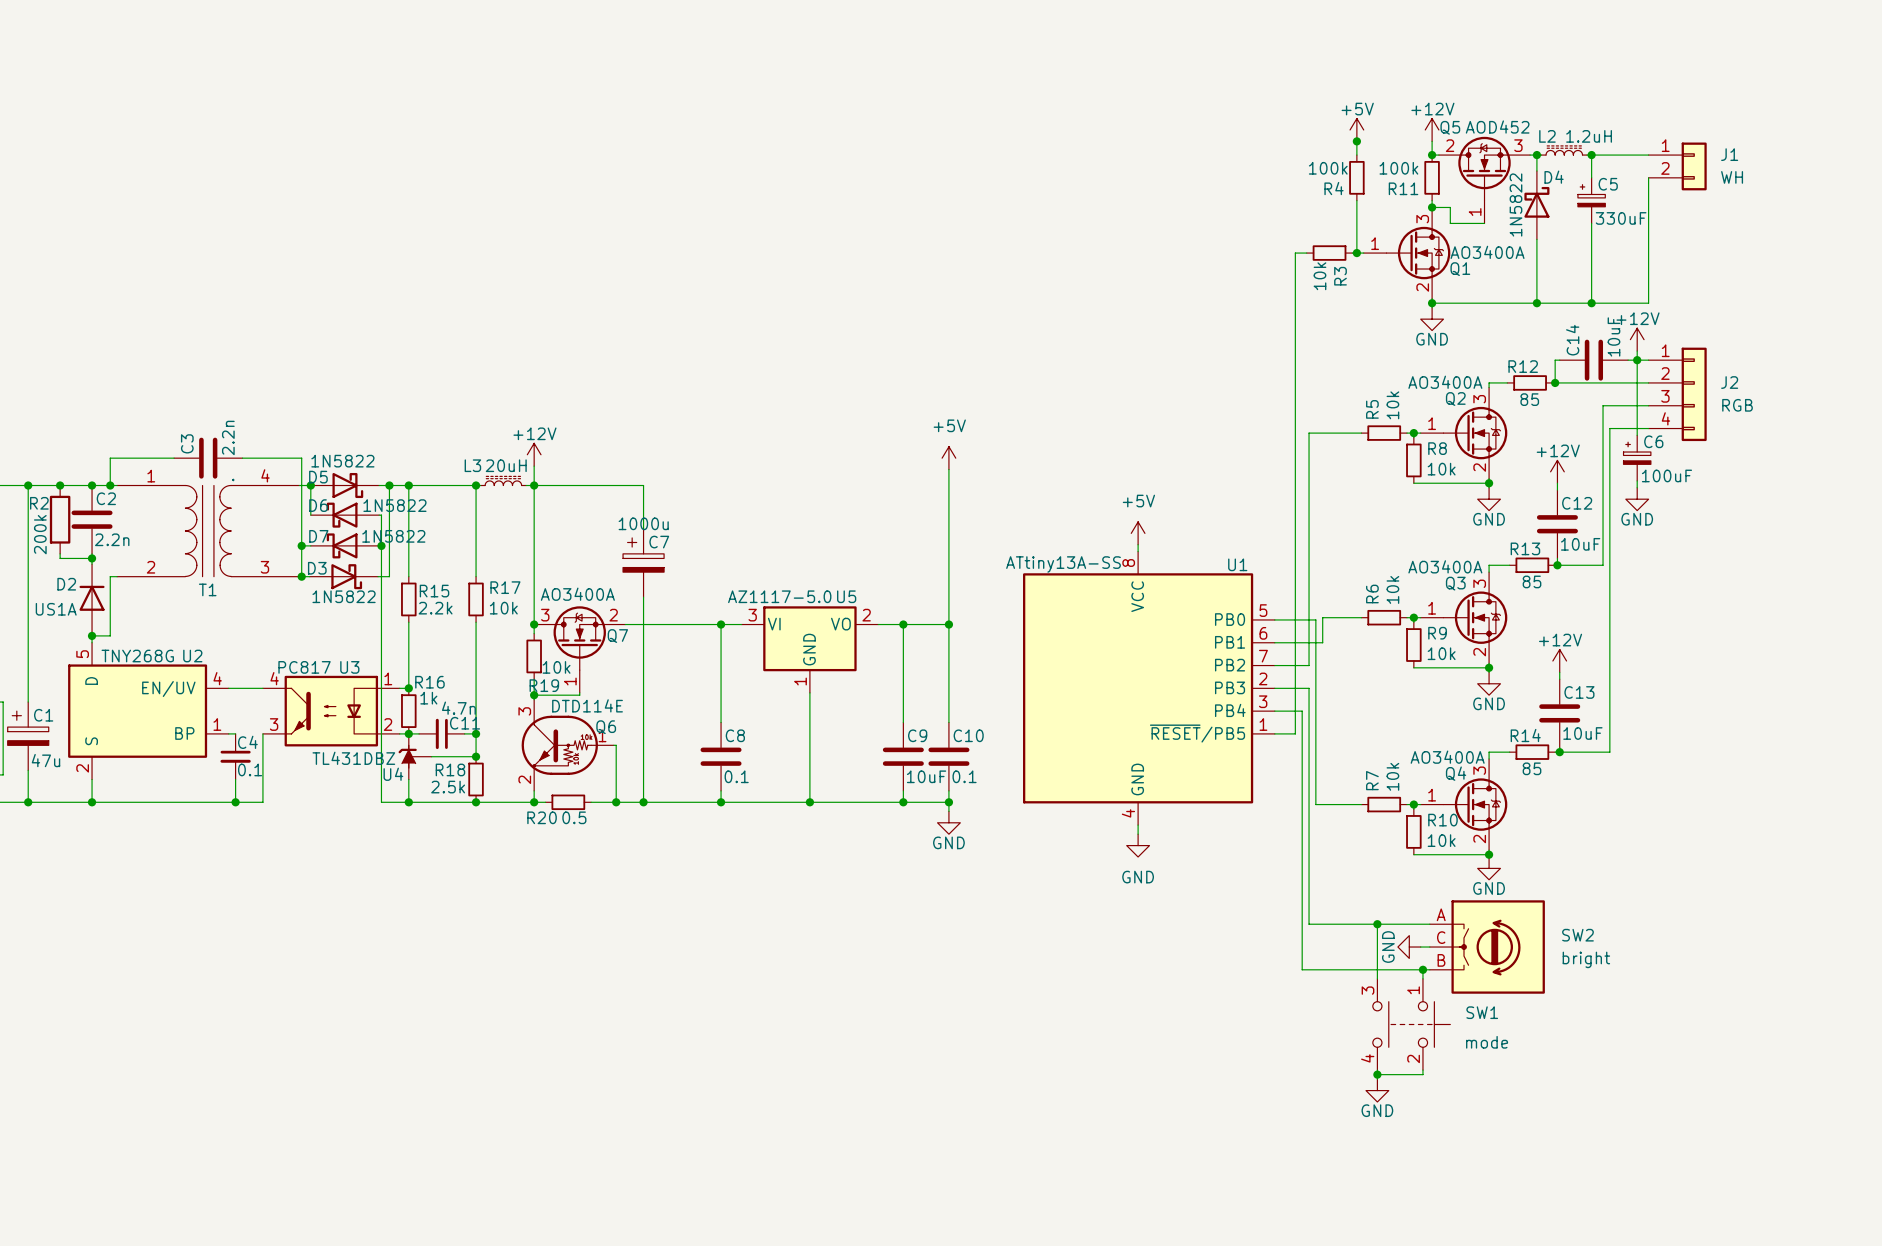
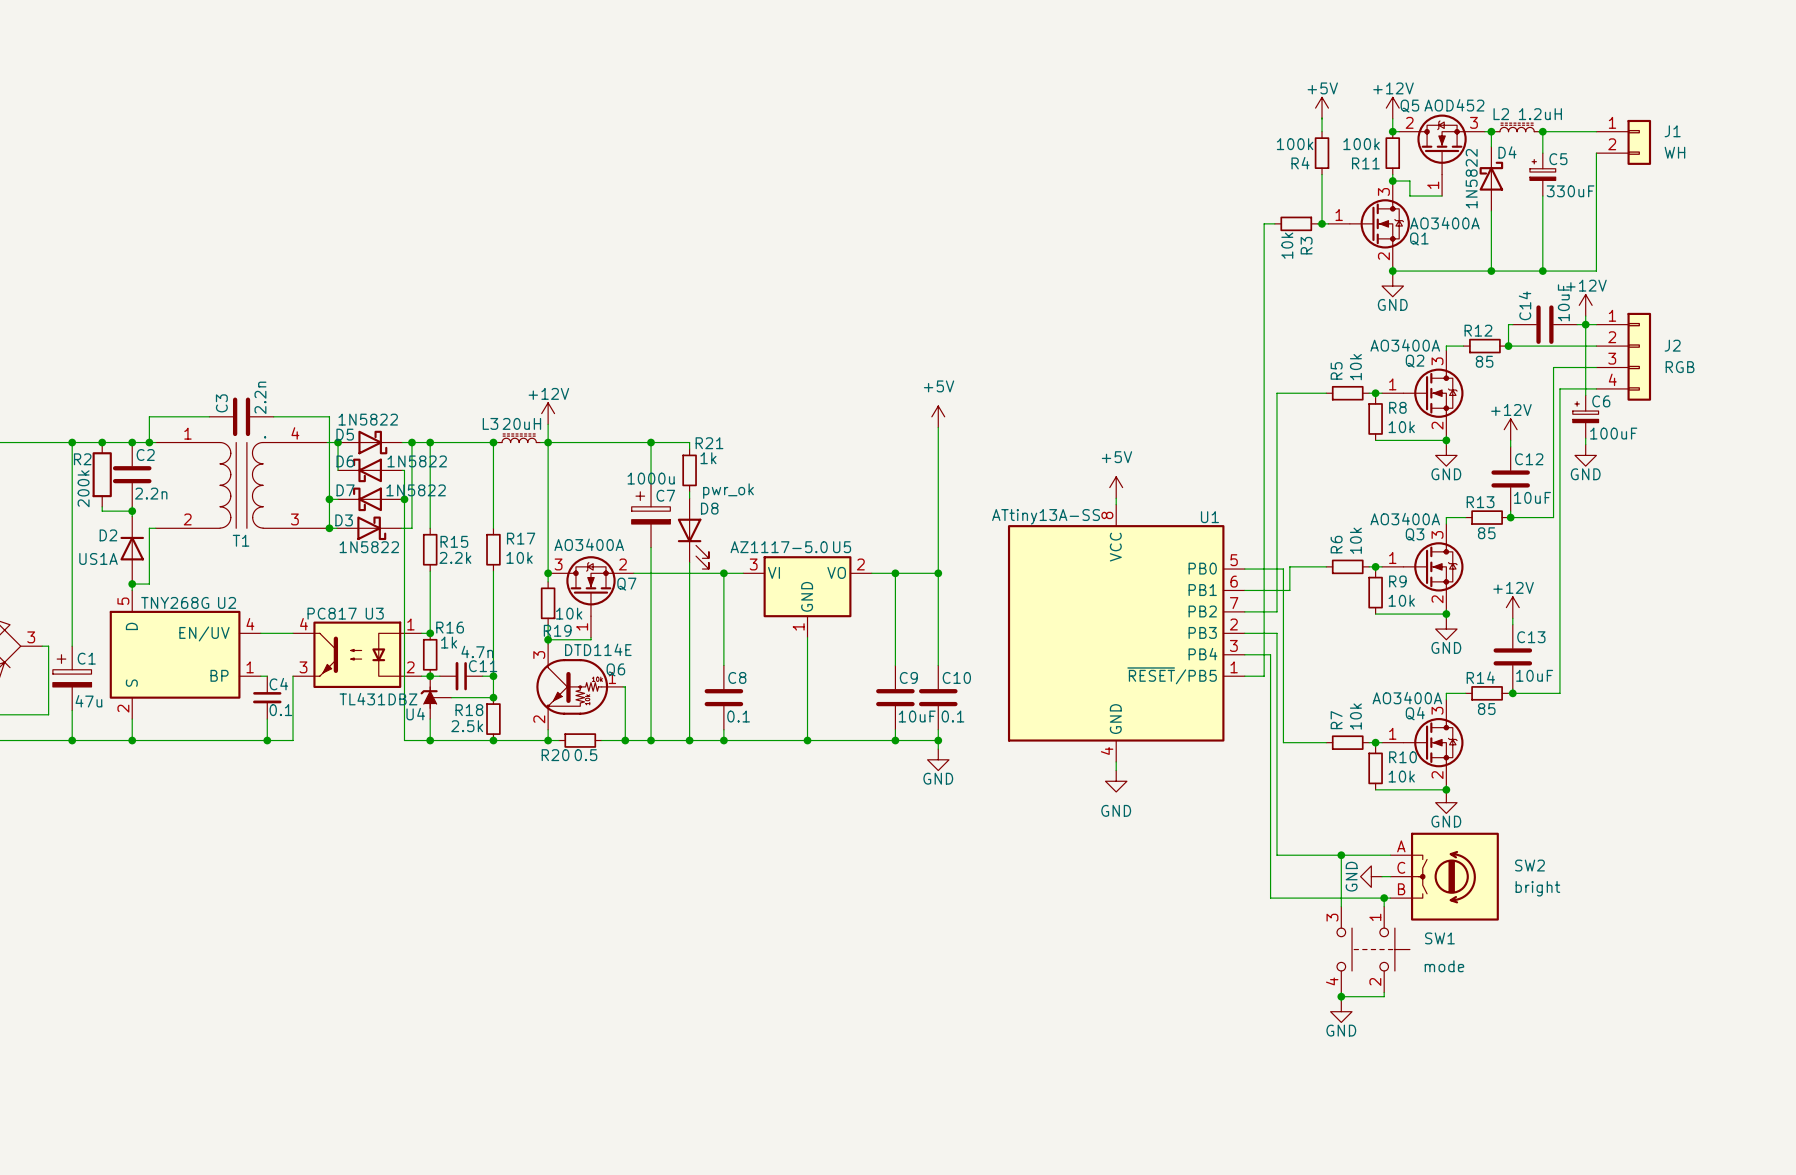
junction: (1356, 141) -> none
wire: none -> (651, 442) (689, 442) (689, 448)
junction: none -> (651, 442)
R21: none -> 1k (689, 470)
wire: none -> (689, 491) (689, 498)
D8: none -> pwr_ok (693, 533)
wire: none -> (689, 562) (689, 740)
junction: none -> (689, 740)

